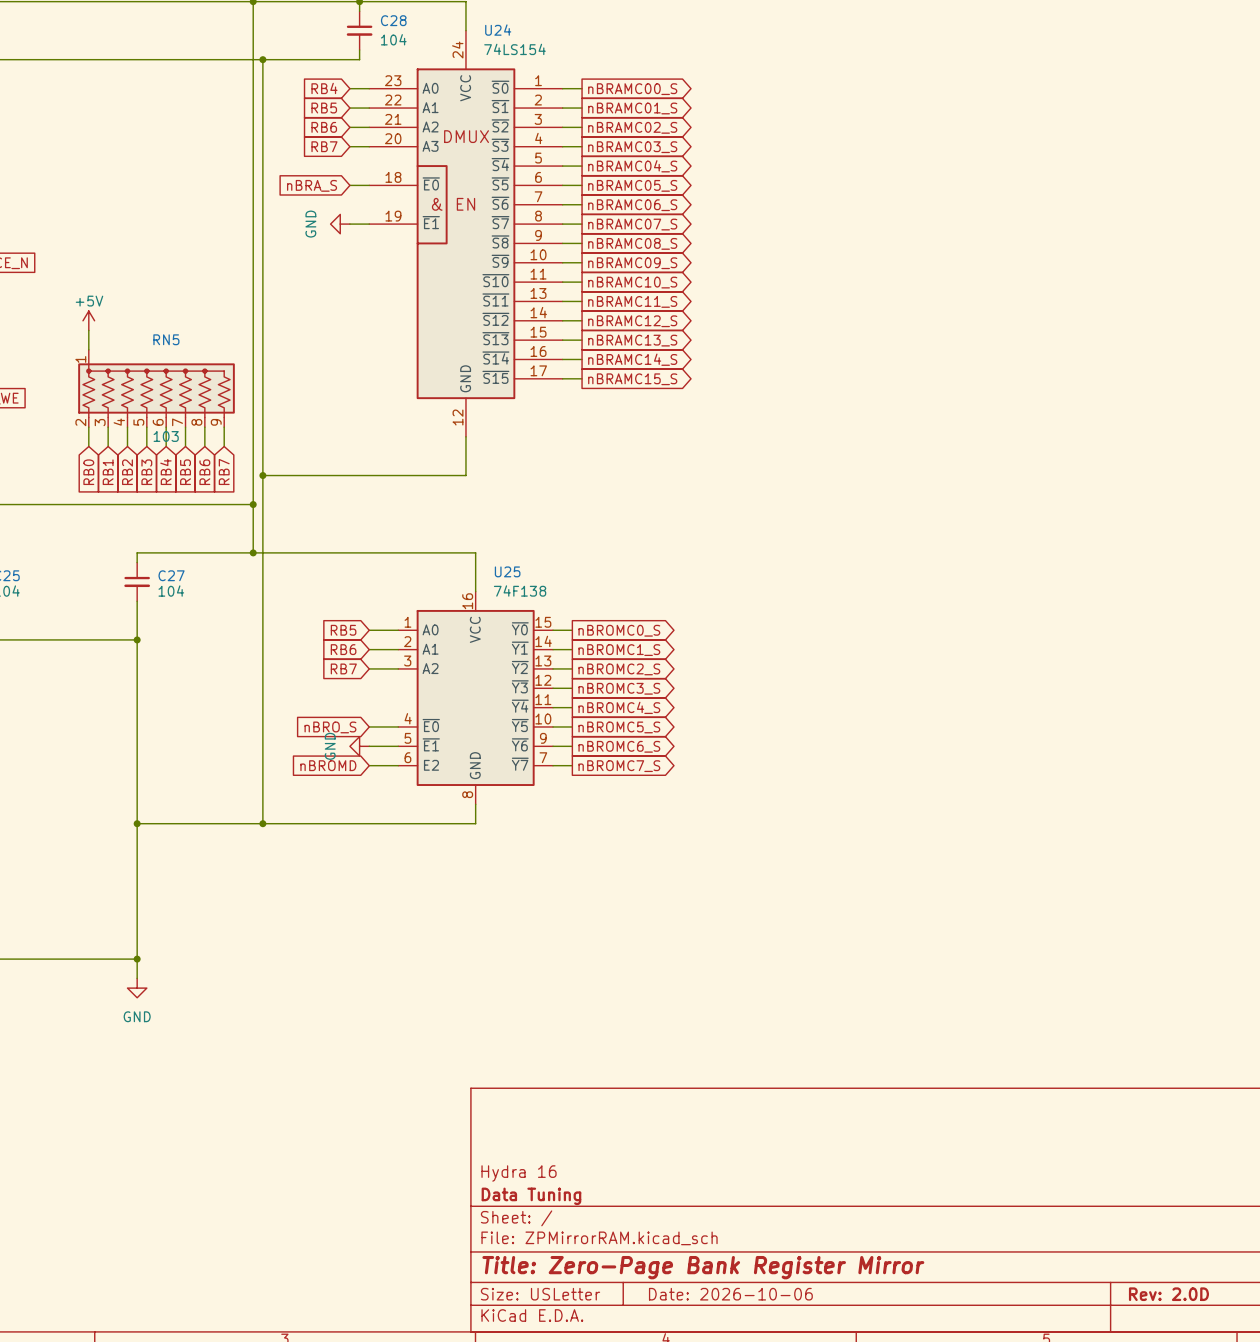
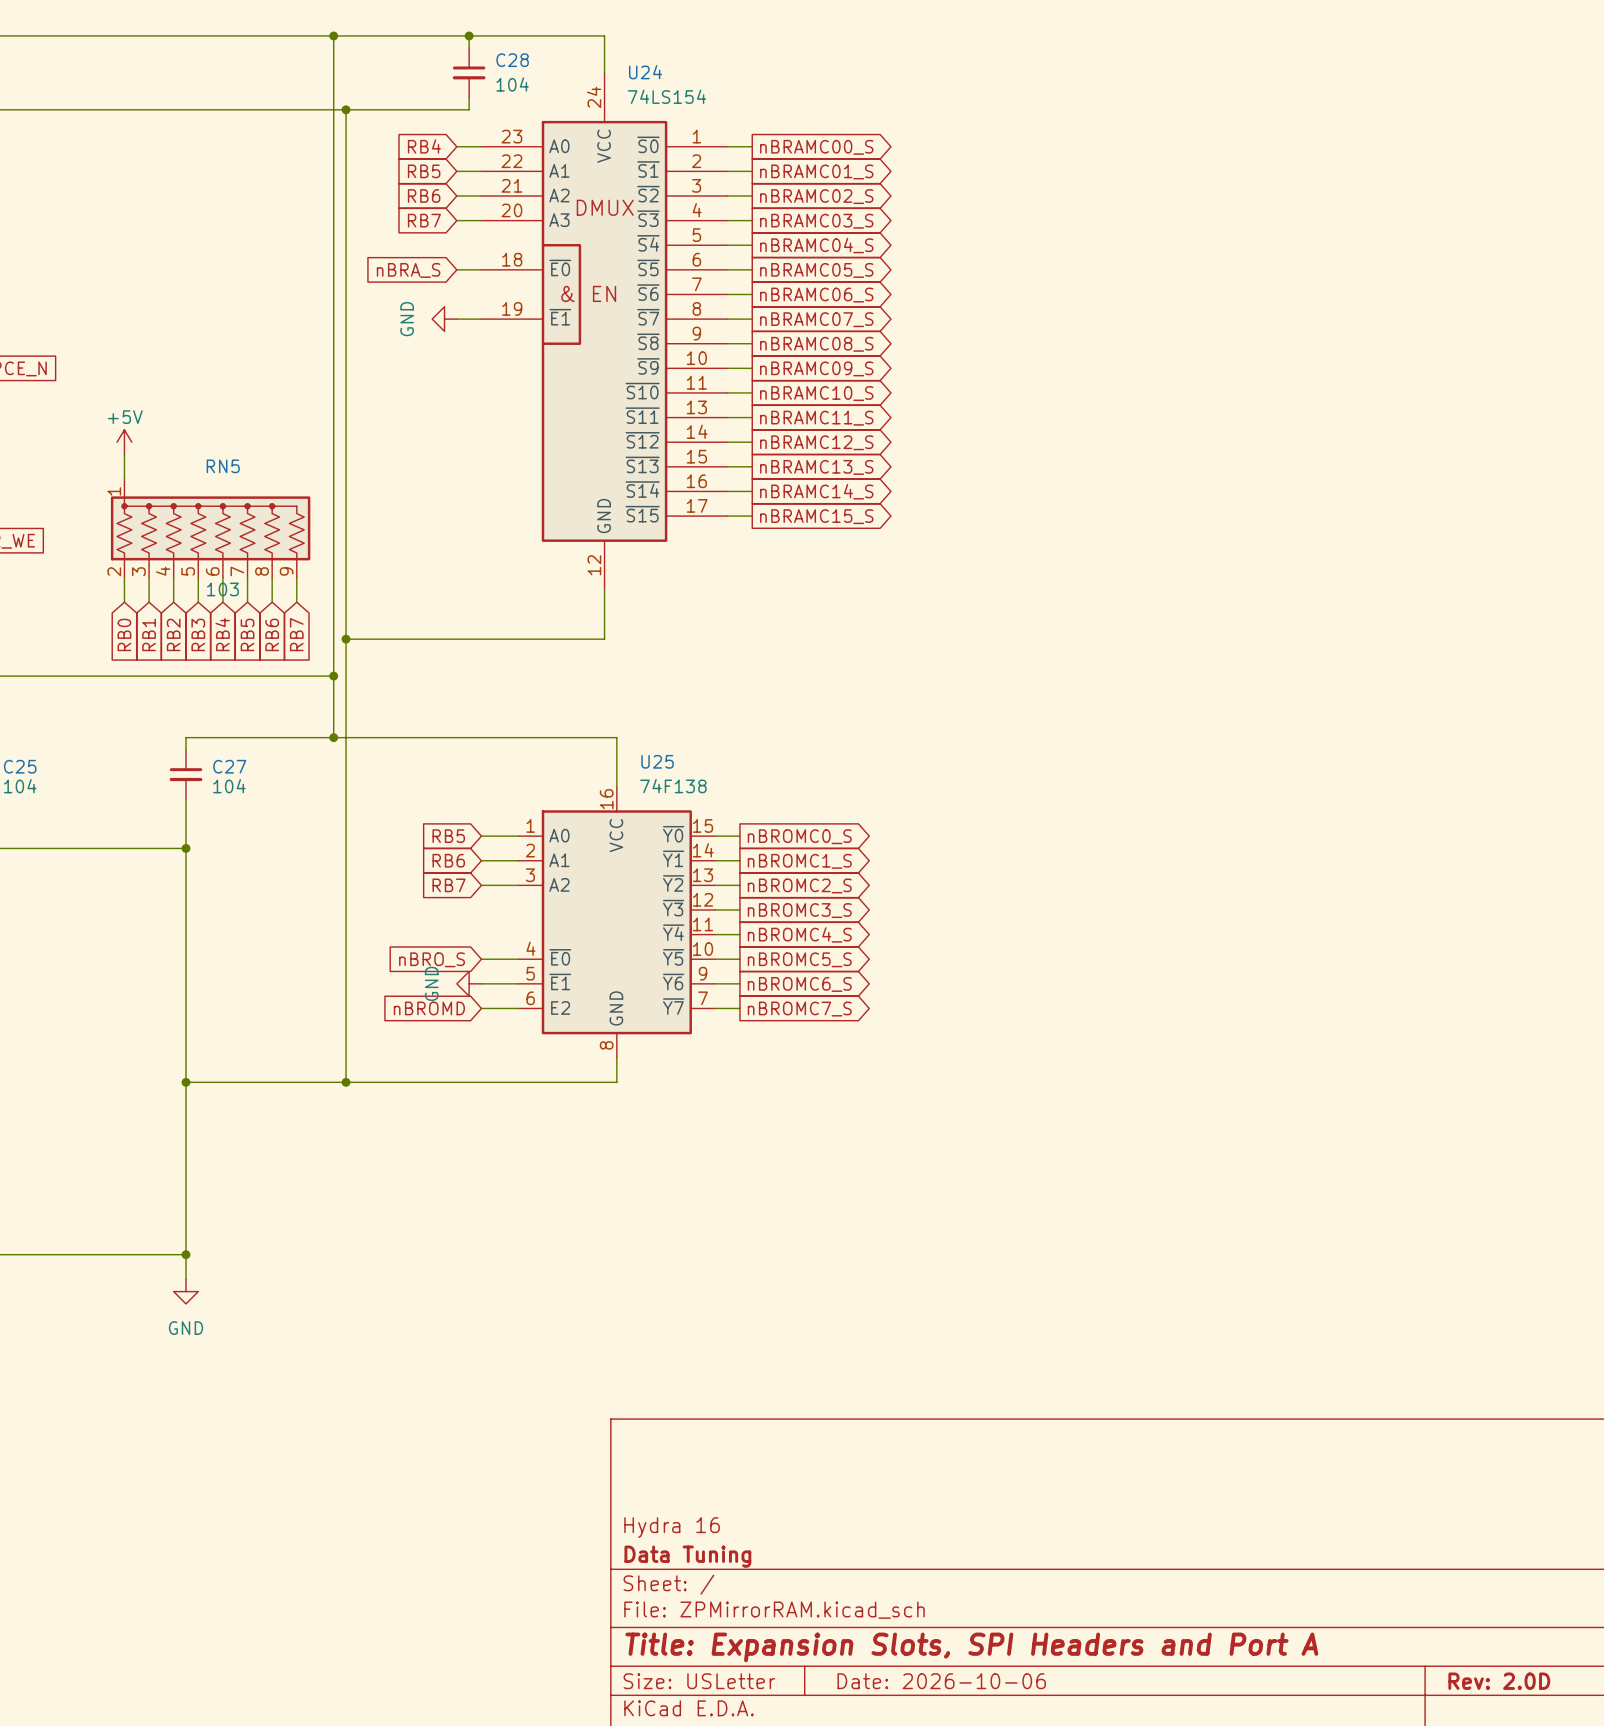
title block: Title: Zero-Page Bank Register Mirror (703, 1267) -> Title: Expansion Slots, SPI Headers and Port A (971, 1647)

